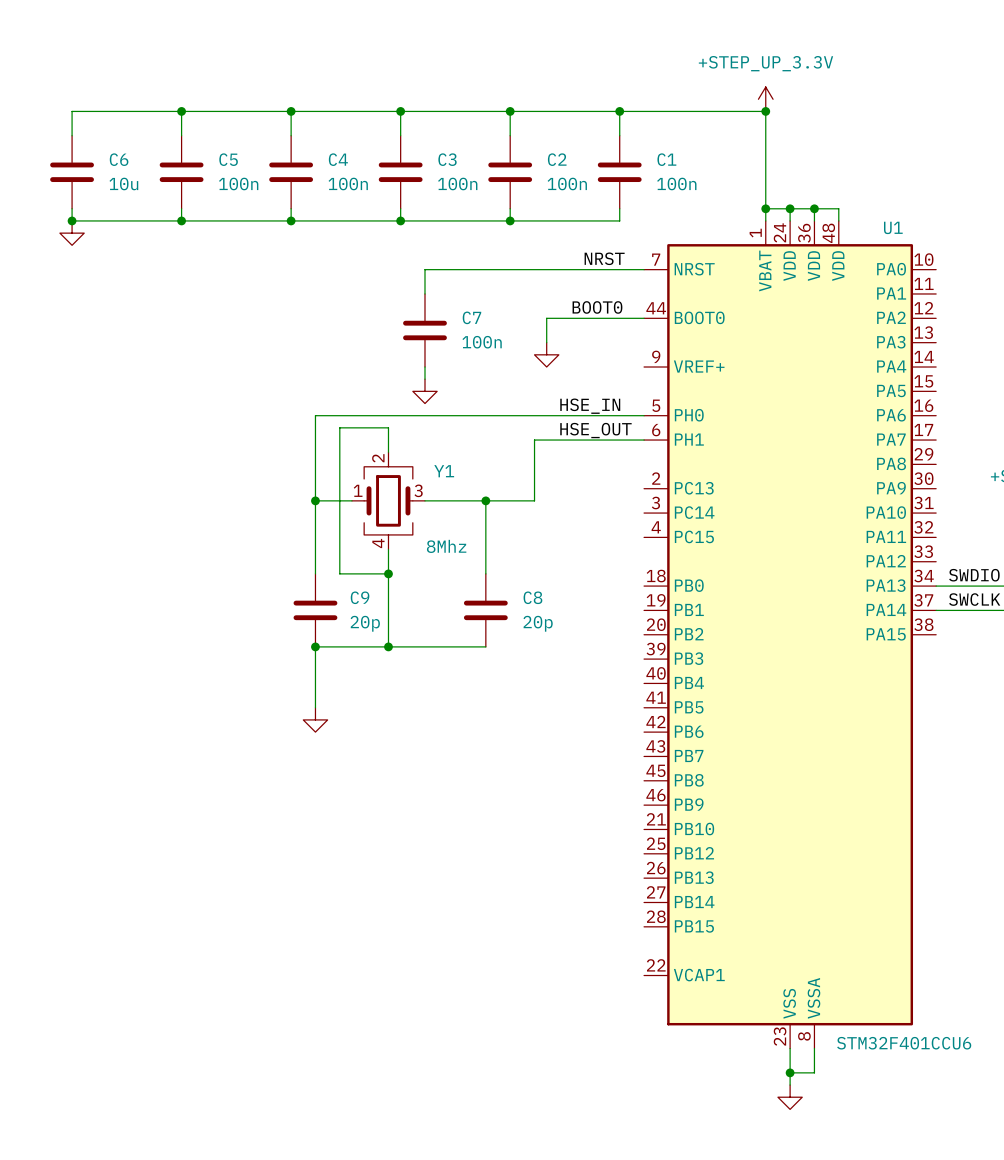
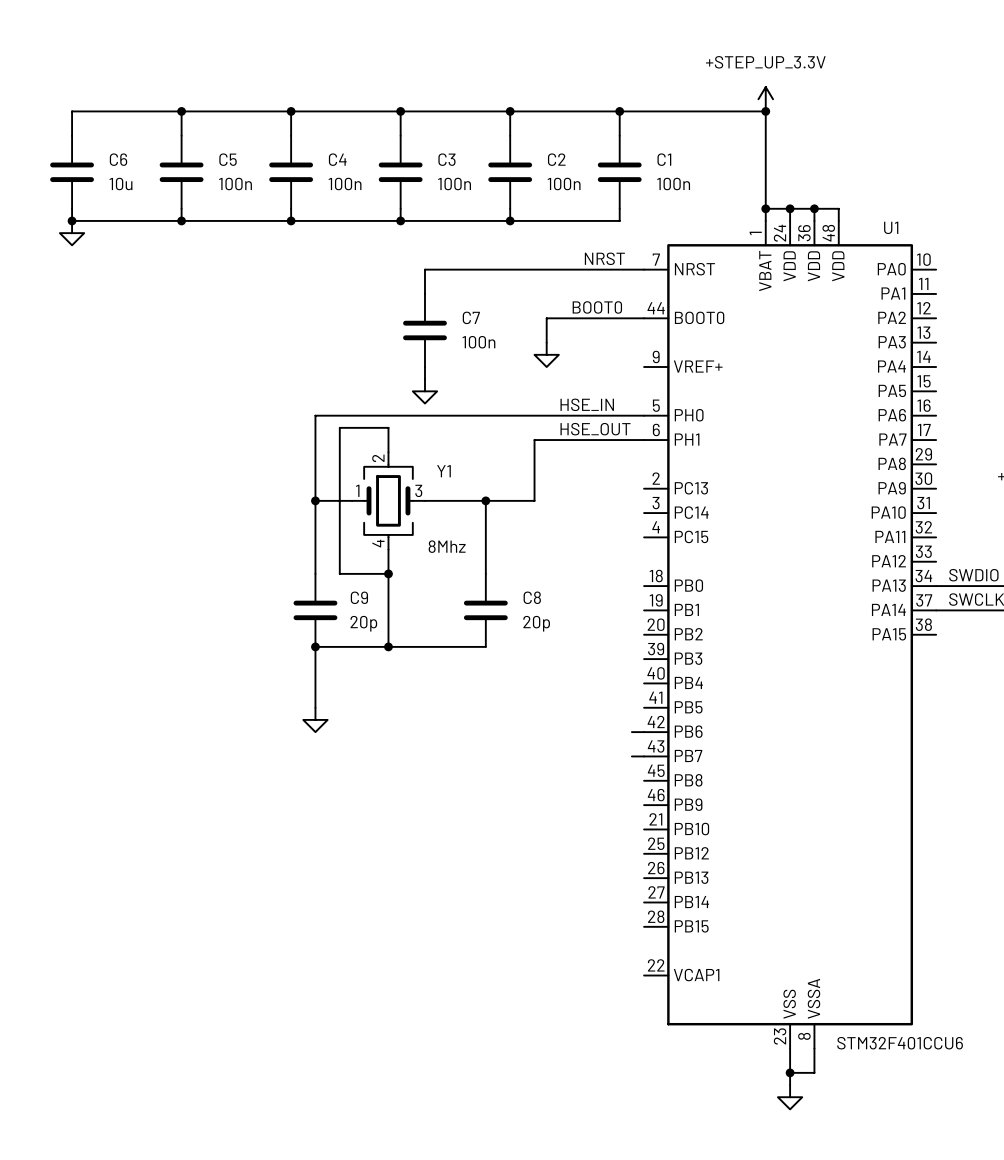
wire: none -> (631, 732) (644, 732)
wire: none -> (631, 756) (644, 756)

